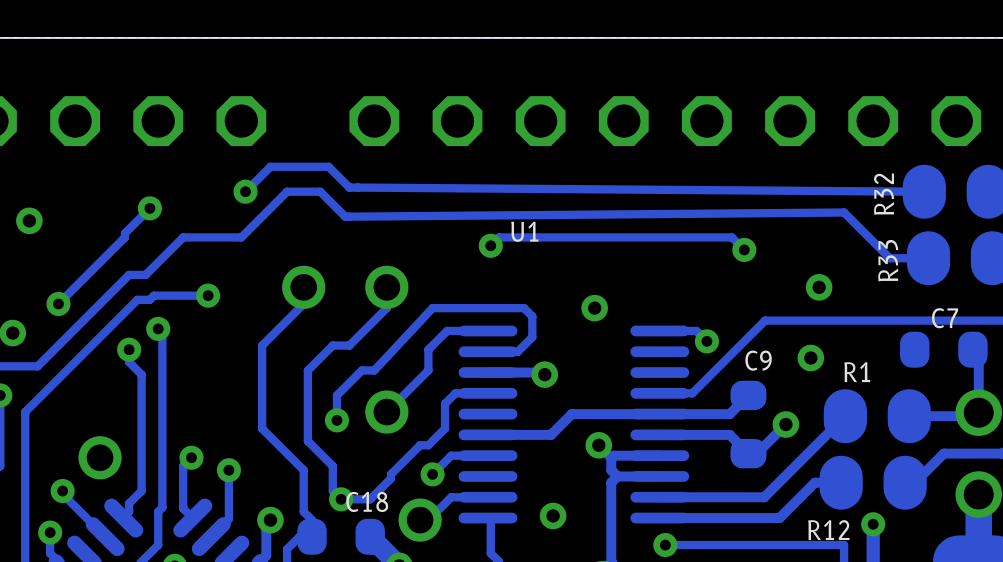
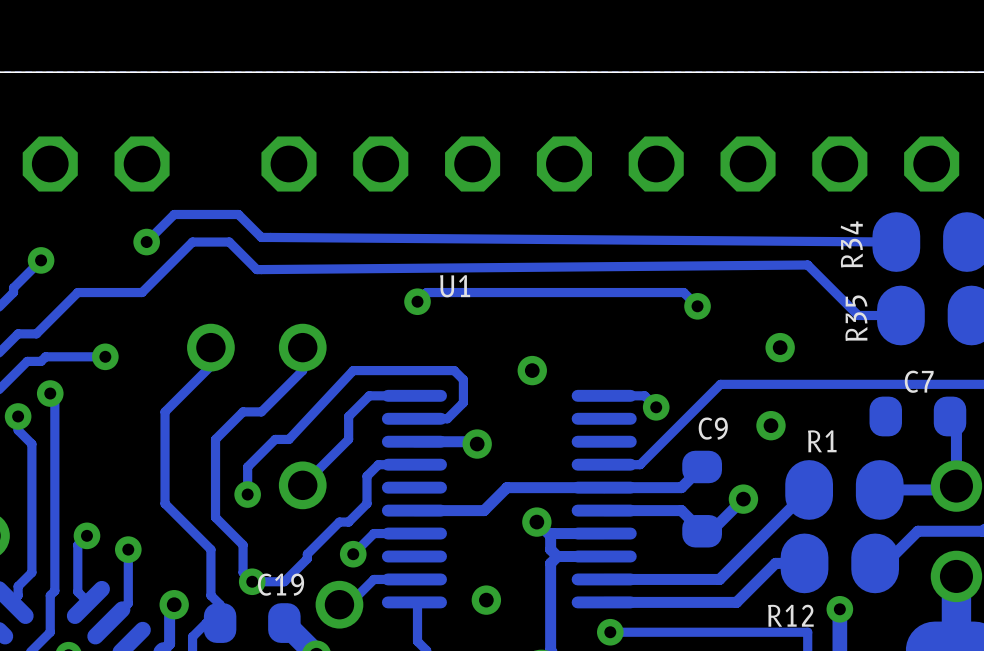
R32 name: R32 (884, 194) -> R34 (851, 244)
R33 name: R33 (888, 260) -> R35 (856, 318)
C18 name: C18 (367, 501) -> C19 (281, 584)

